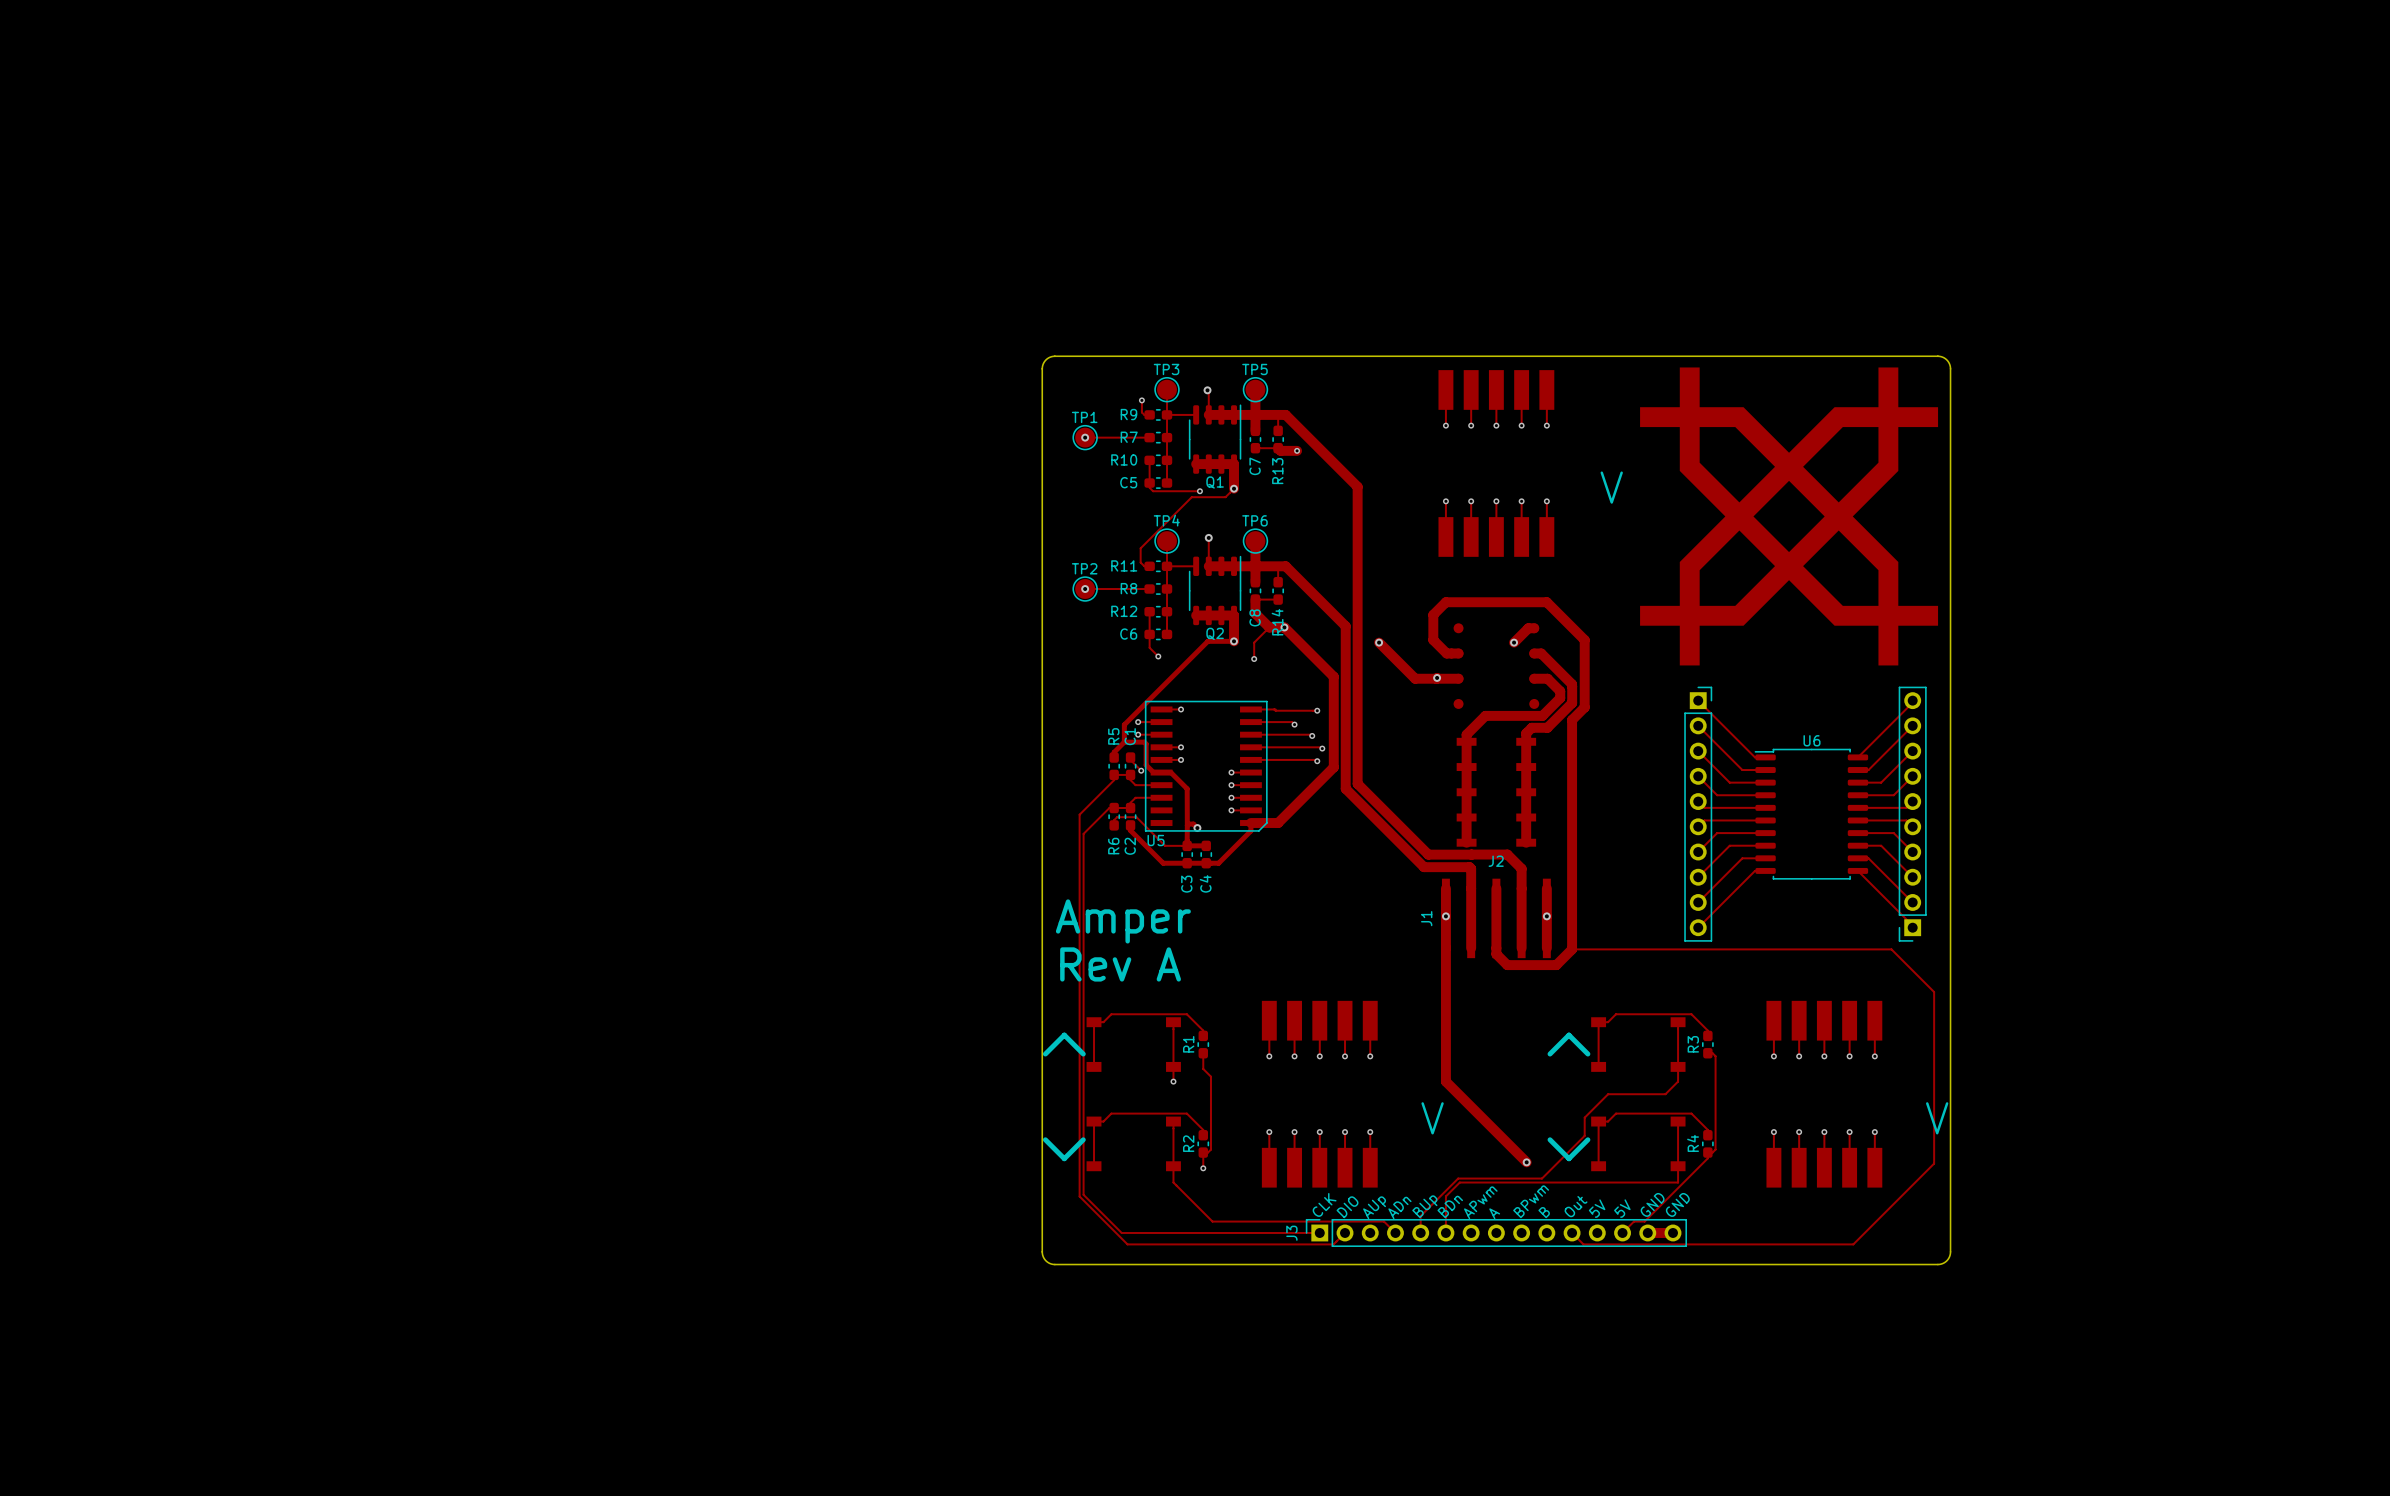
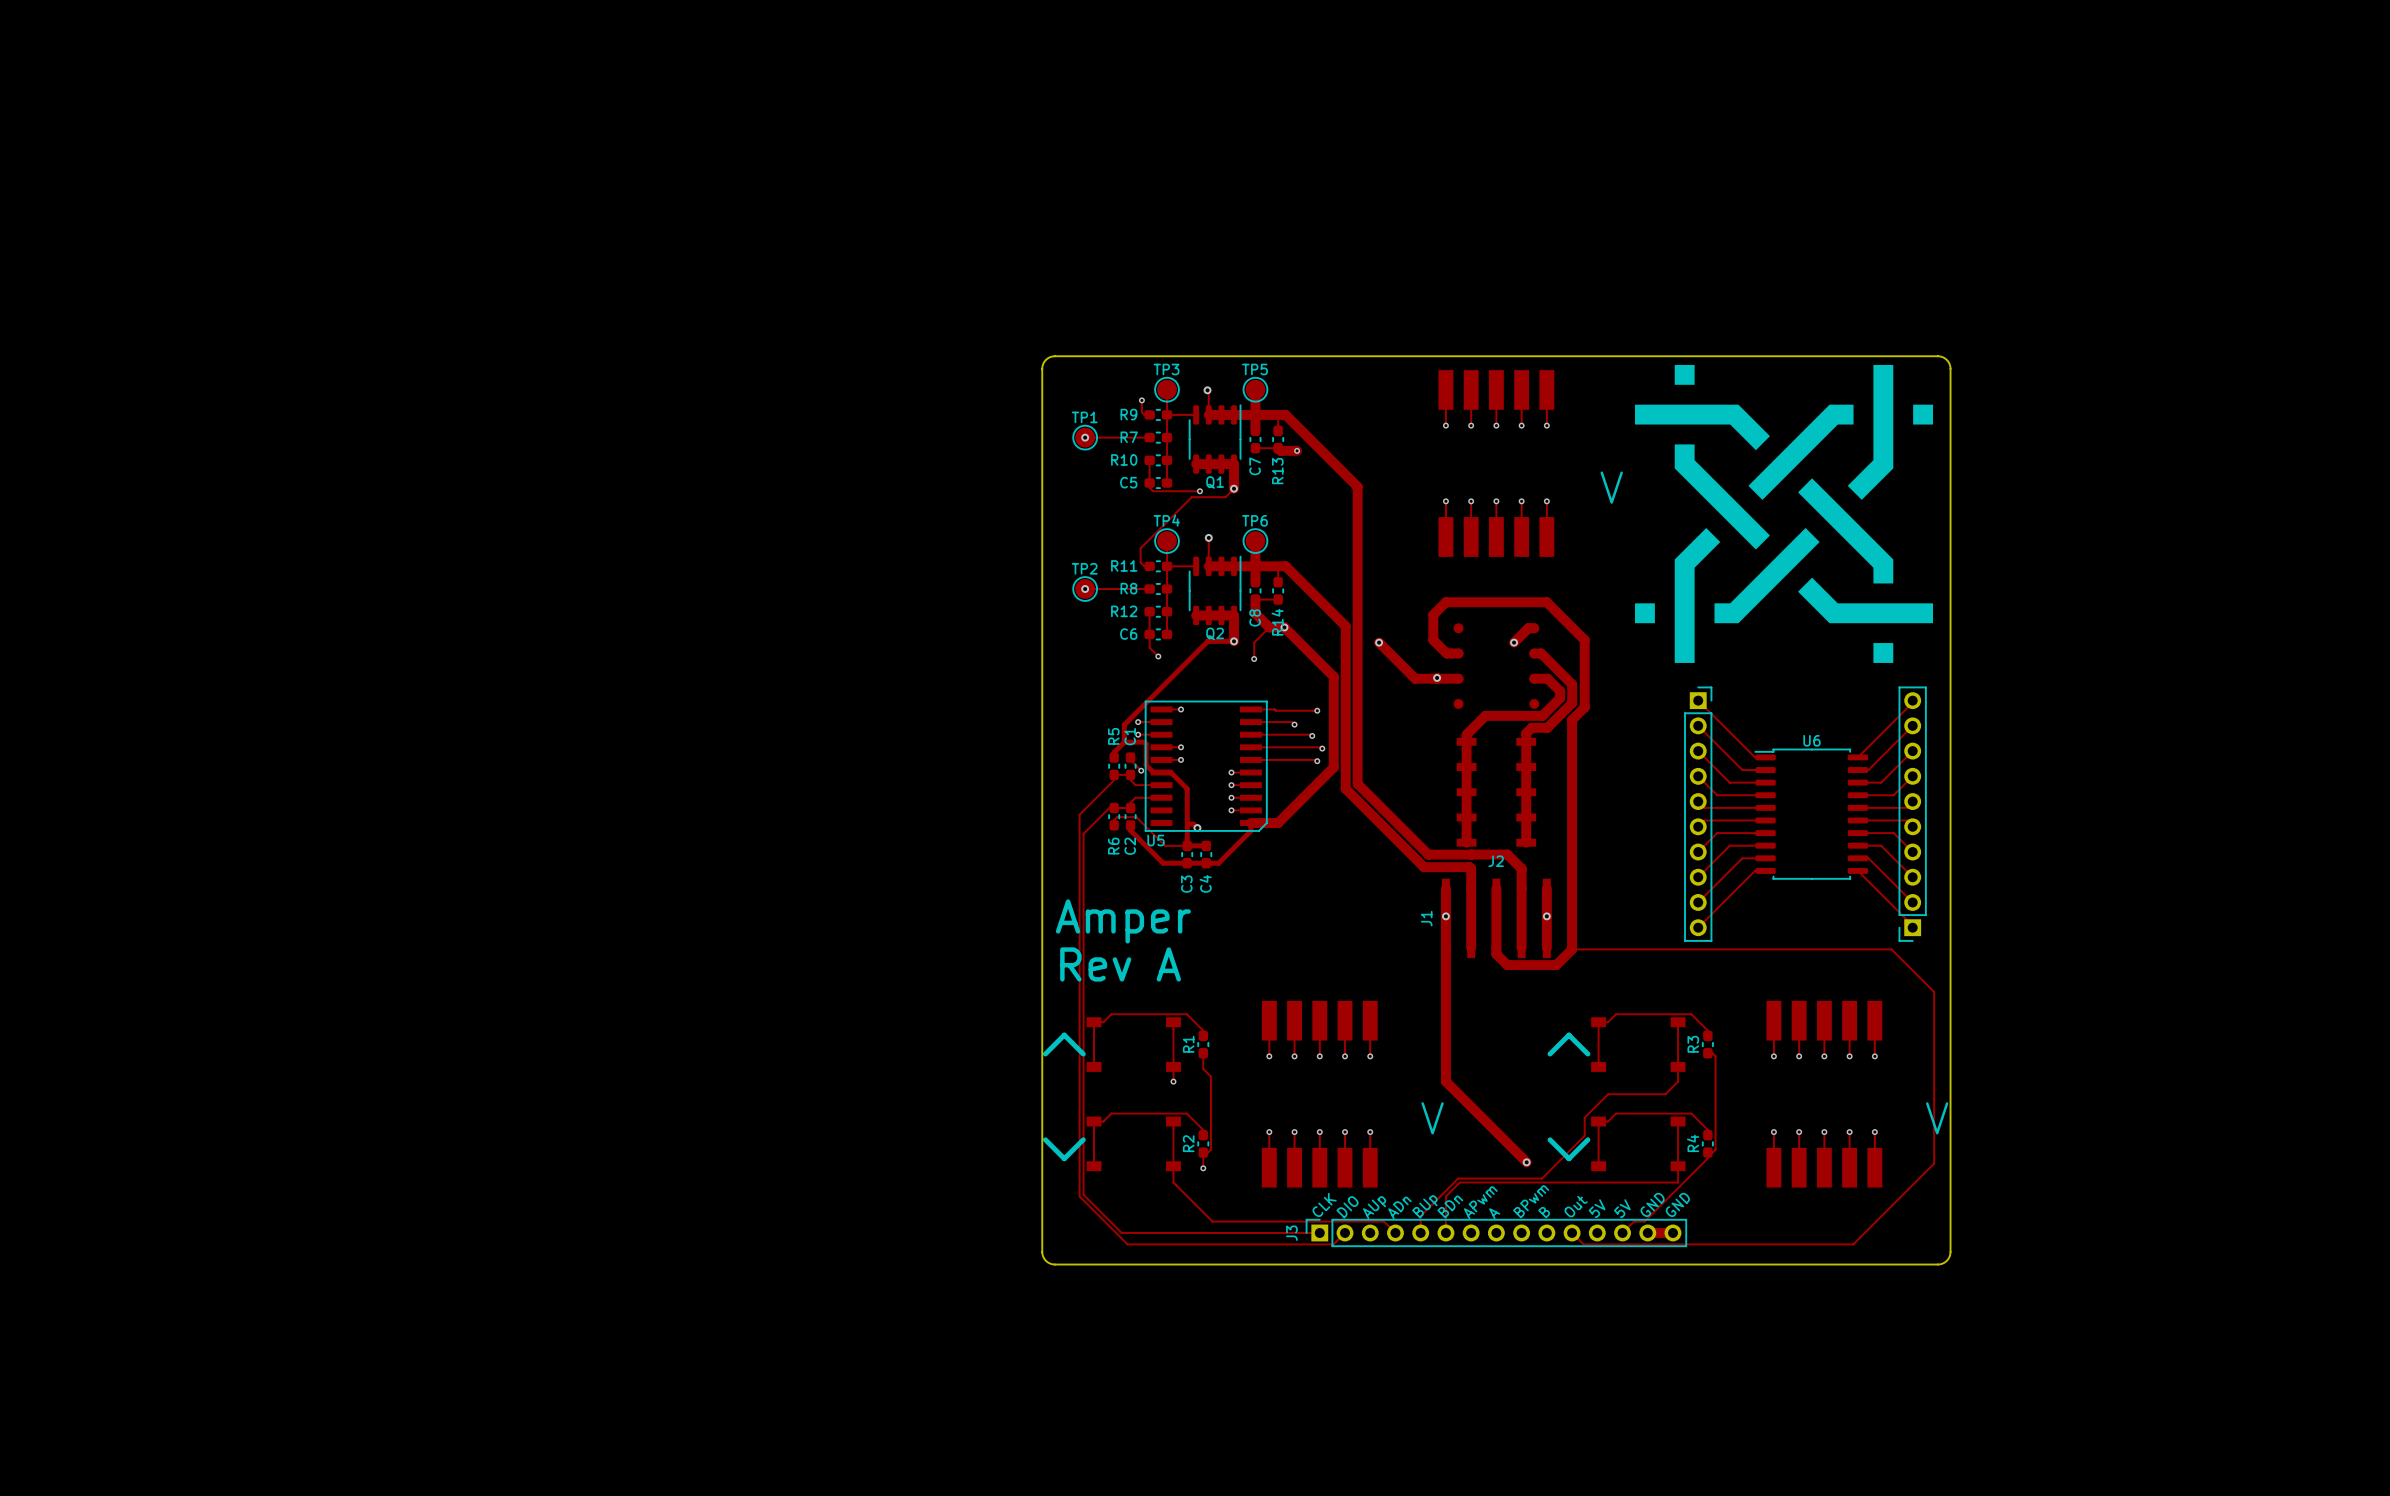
drawing shape: [1640, 367, 1939, 666] -> [1635, 364, 1934, 663]

